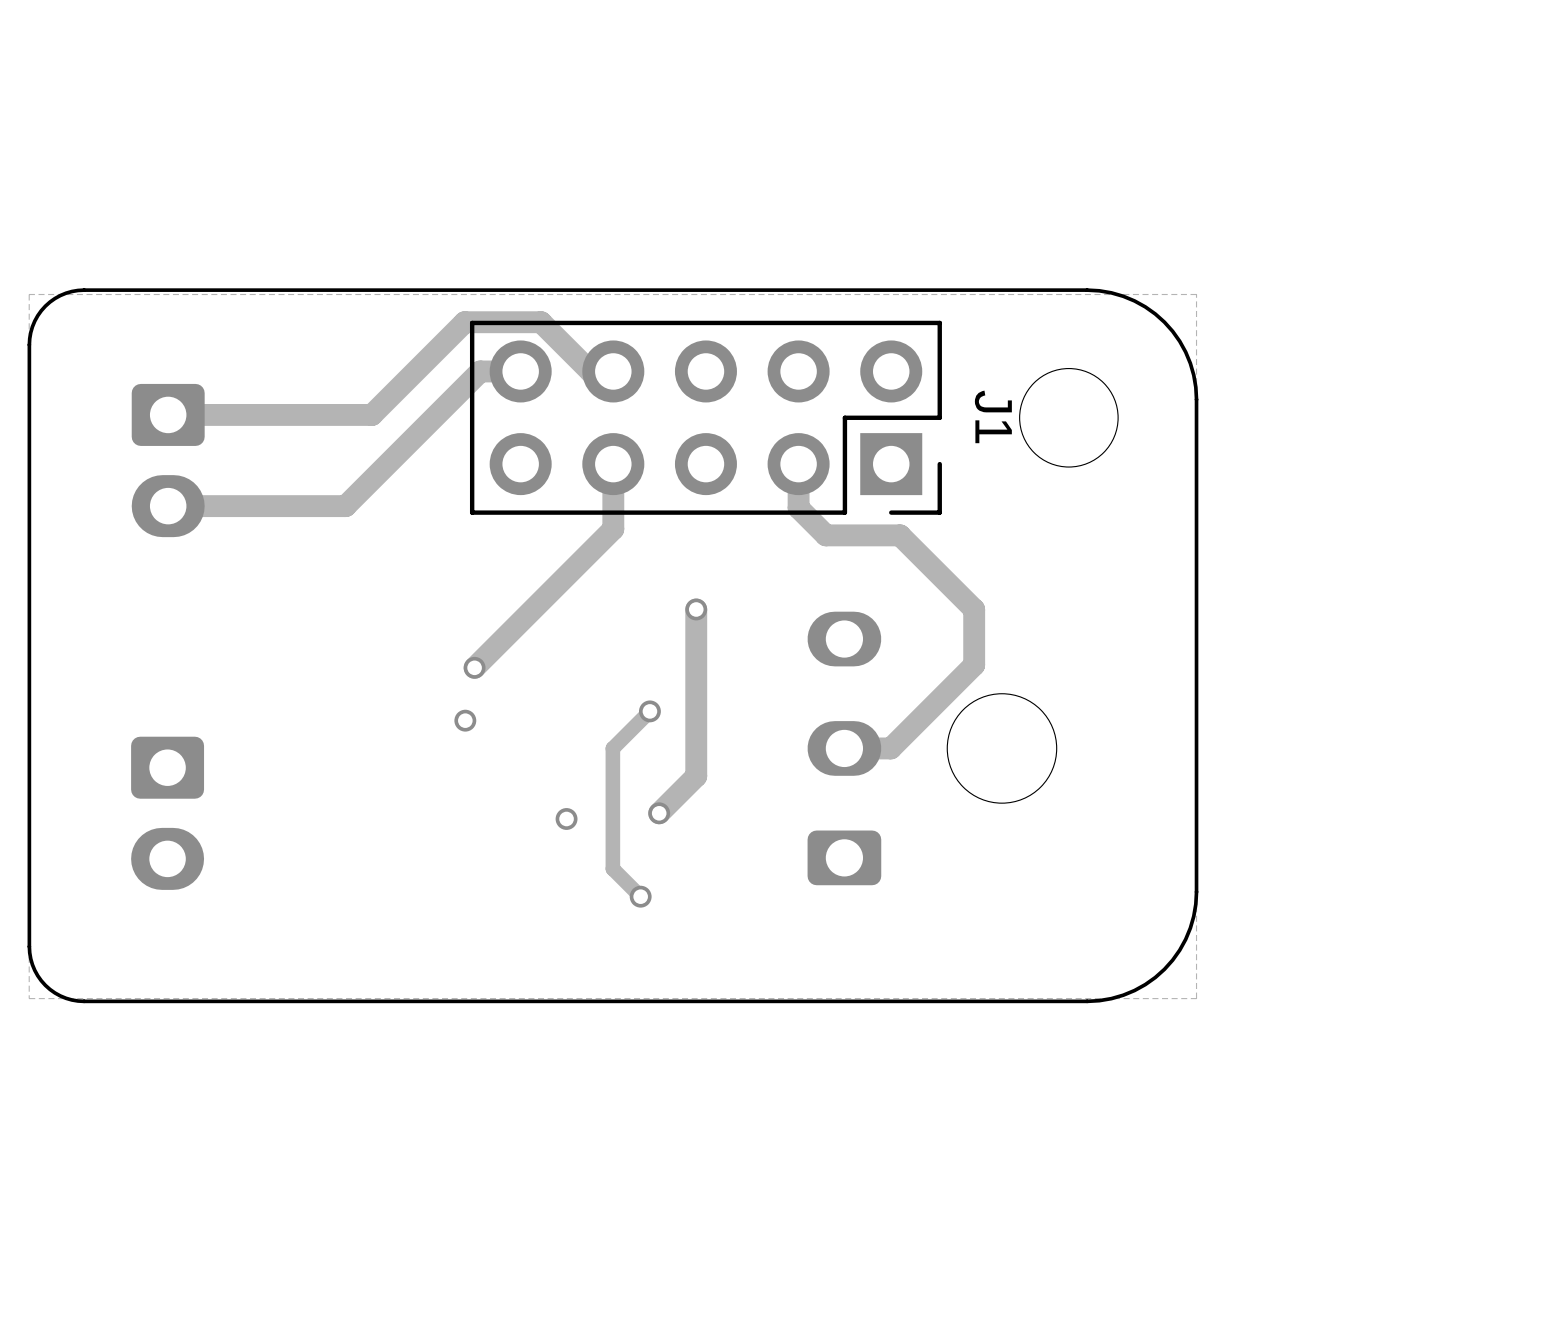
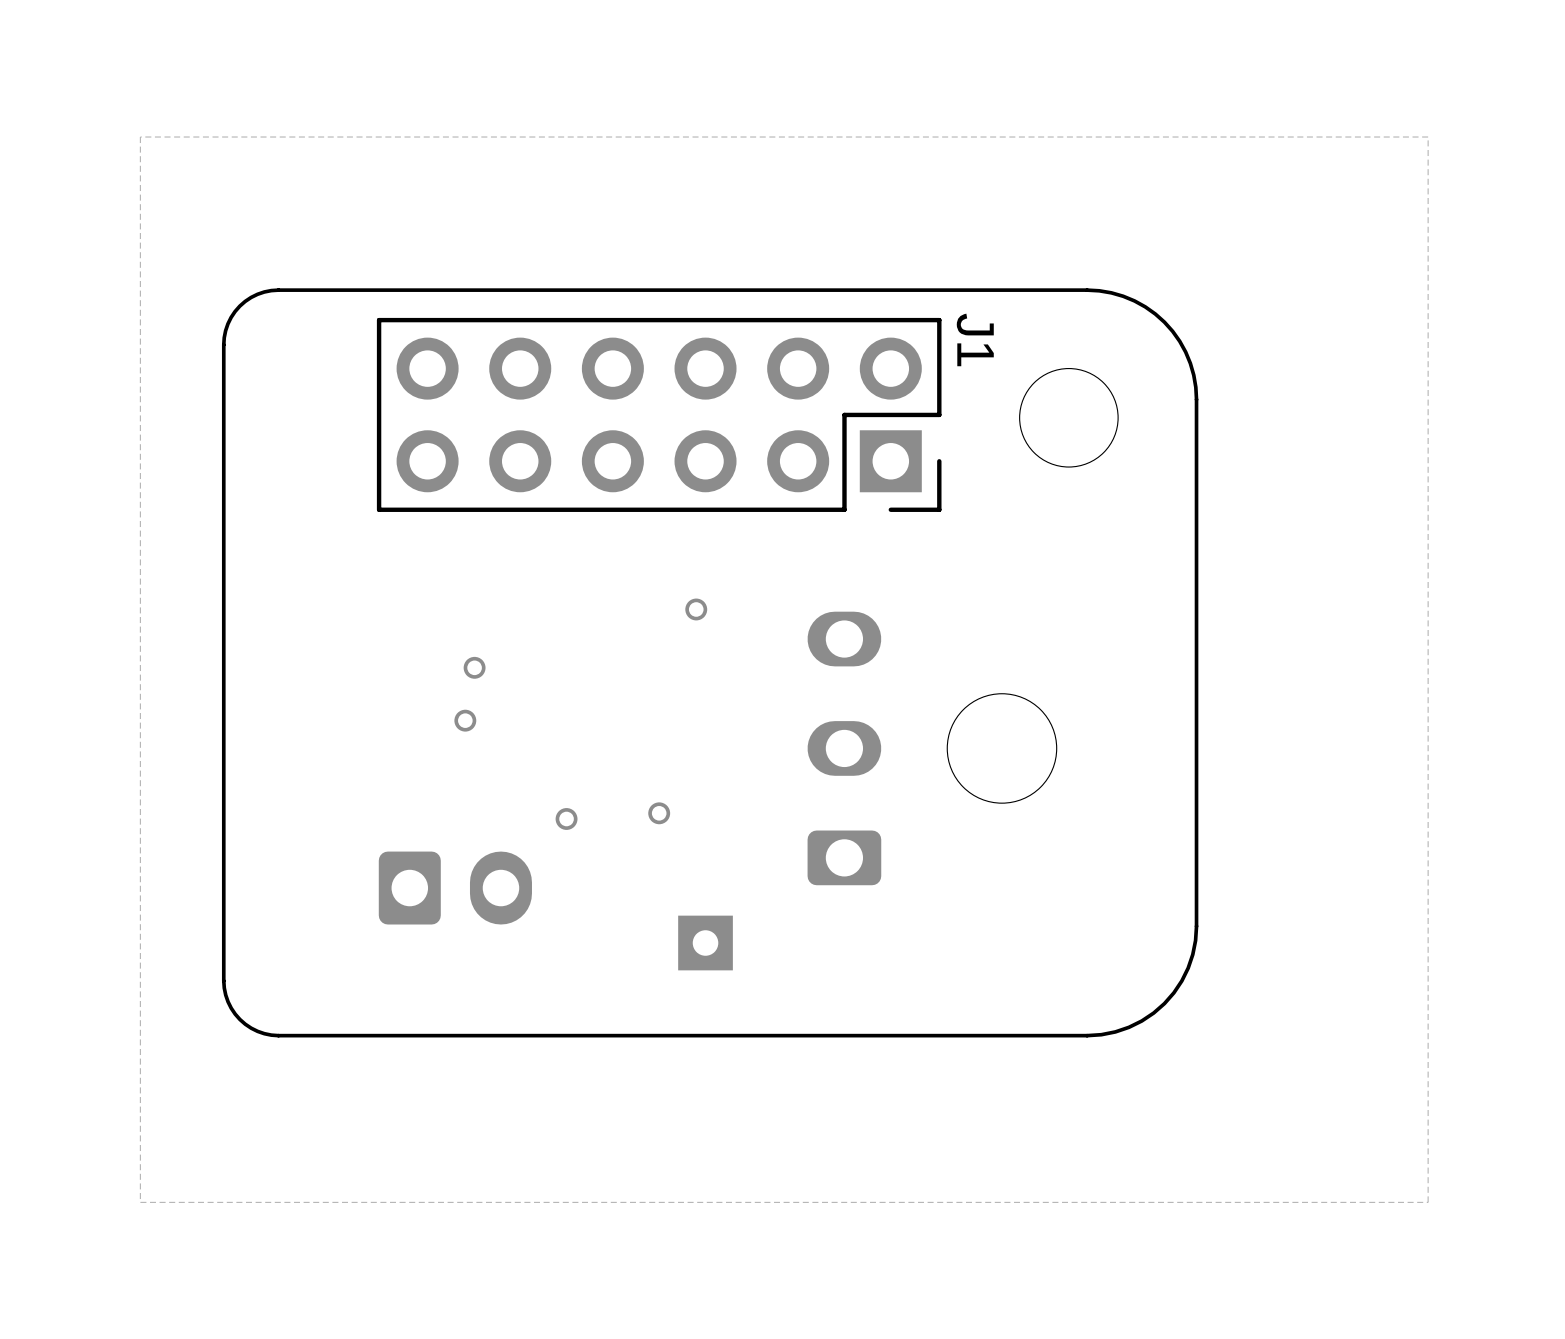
board edge: (278, 290) (77, 290) (66, 293) (49, 302) (41, 310) (32, 326) (29, 344) (29, 946) (34, 970) (45, 985) (54, 992) (71, 999) (84, 1001) (1099, 1000) (1123, 995) (1145, 984) (1172, 960) (1190, 928) (1196, 891) -> (278, 290) (257, 294) (239, 306) (227, 323) (223, 344) (223, 980) (225, 995) (231, 1008) (239, 1019) (251, 1028) (264, 1033) (278, 1035) (1101, 1034) (1128, 1027) (1153, 1013) (1164, 1003) (1181, 980) (1192, 954) (1195, 940) (1196, 891)
zone outline: (1196, 294) (1196, 998) (29, 998) (29, 294) (1196, 294) -> (1428, 137) (1428, 1202) (140, 1202) (140, 137) (1428, 137)
J1 footprint: [469, 320, 942, 515] -> [376, 317, 942, 512]
track: (520, 371) (480, 371) (345, 506) (168, 506) -> none
track: (613, 371) (590, 371) (541, 322) (464, 322) (372, 414) (168, 414) -> none
J1 name position: J1 (993, 416) -> J1 (975, 339)
part: (168, 460) -> none
track: (613, 464) (613, 529) (474, 667) -> none
track: (798, 464) (798, 508) (825, 535) (900, 535) (974, 609) (974, 665) (890, 748) (844, 748) -> none
track: (696, 609) (696, 776) (659, 813) -> none
track: (649, 711) (612, 748) (612, 868) (640, 896) -> none
via: (649, 711) -> none
part: (167, 813) -> none
part: none -> (455, 888)
via: (640, 896) -> none
part: none -> (705, 943)

